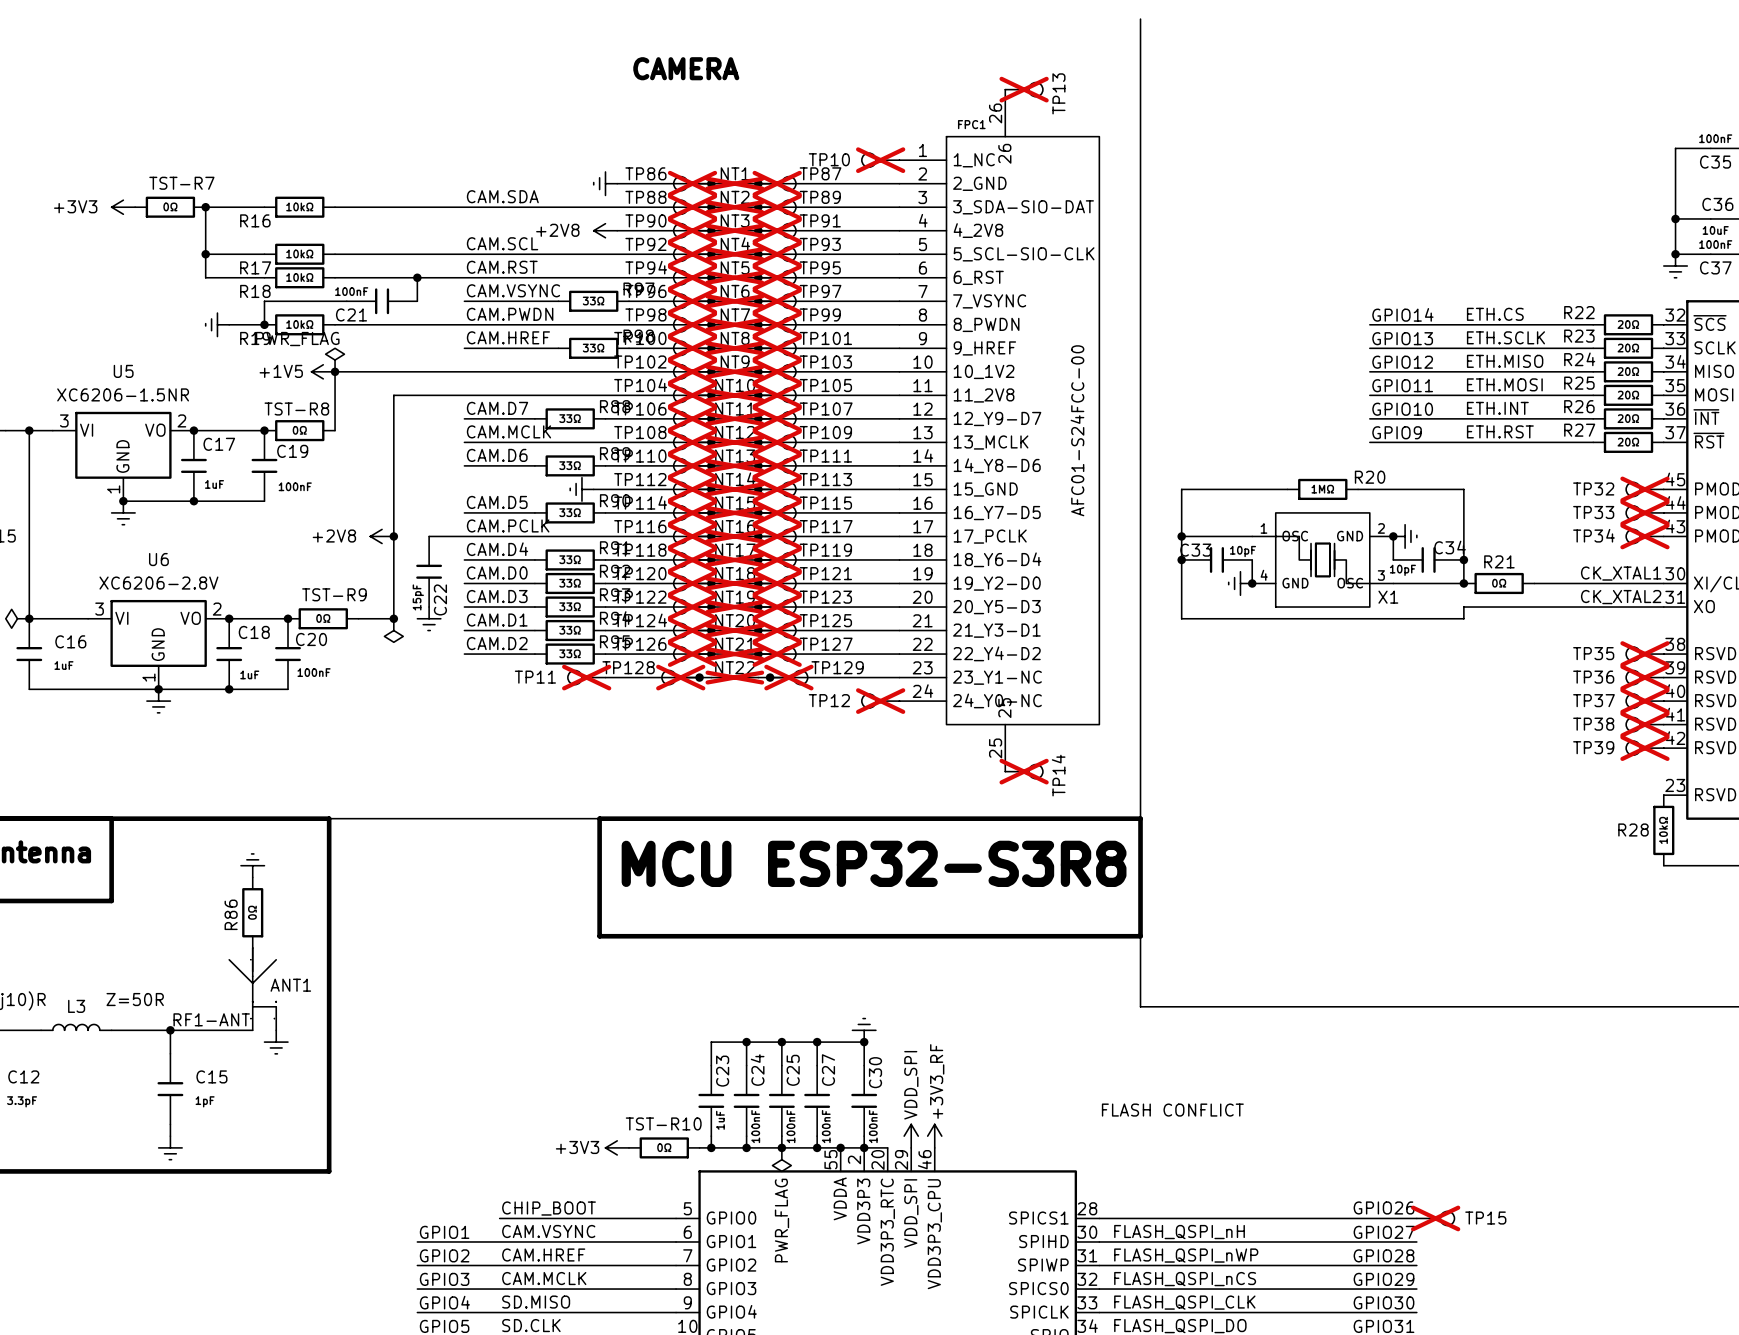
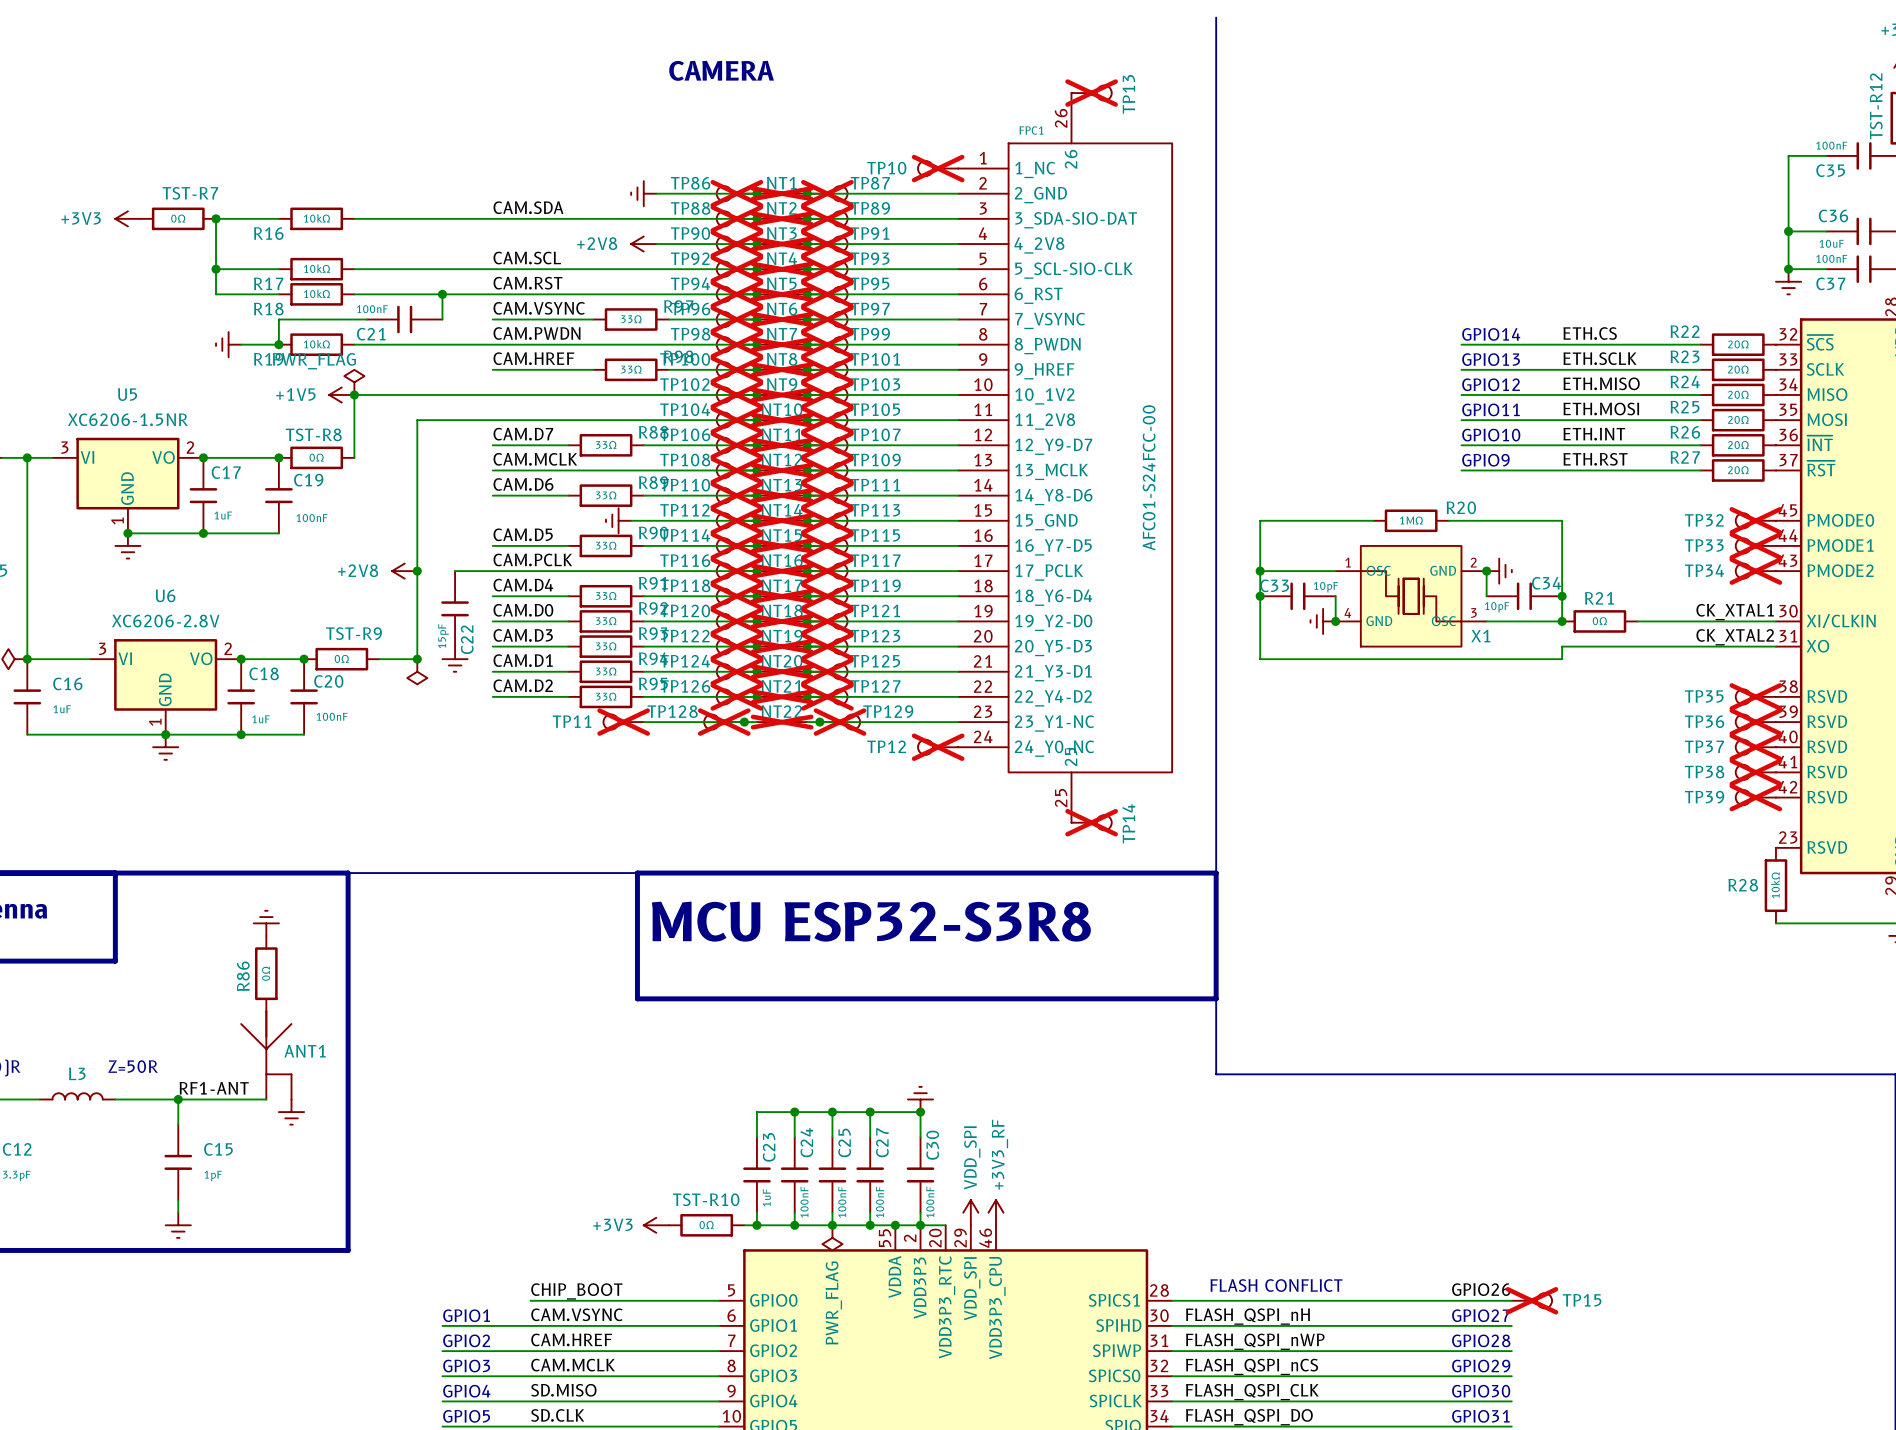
text position: FLASH CONFLICT (1172, 1110) -> FLASH CONFLICT (1276, 1285)

